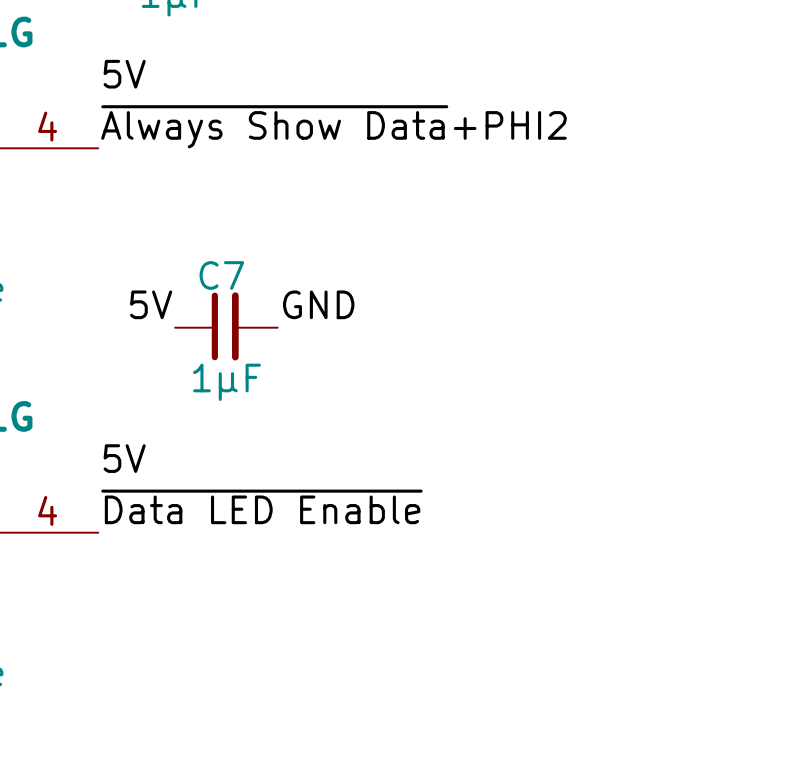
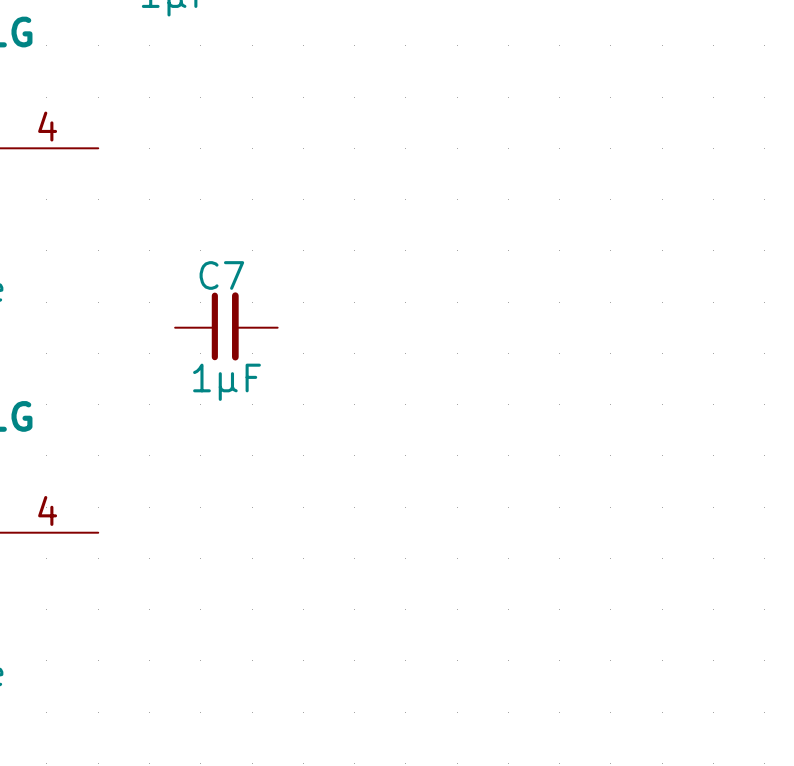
label: 5V (124, 74) -> none
label: ~{Always Show Data}+PHI2 (333, 126) -> none
label: 5V (151, 304) -> none
label: GND (318, 304) -> none
label: 5V (124, 458) -> none
label: ~{Data LED Enable} (261, 506) -> none

